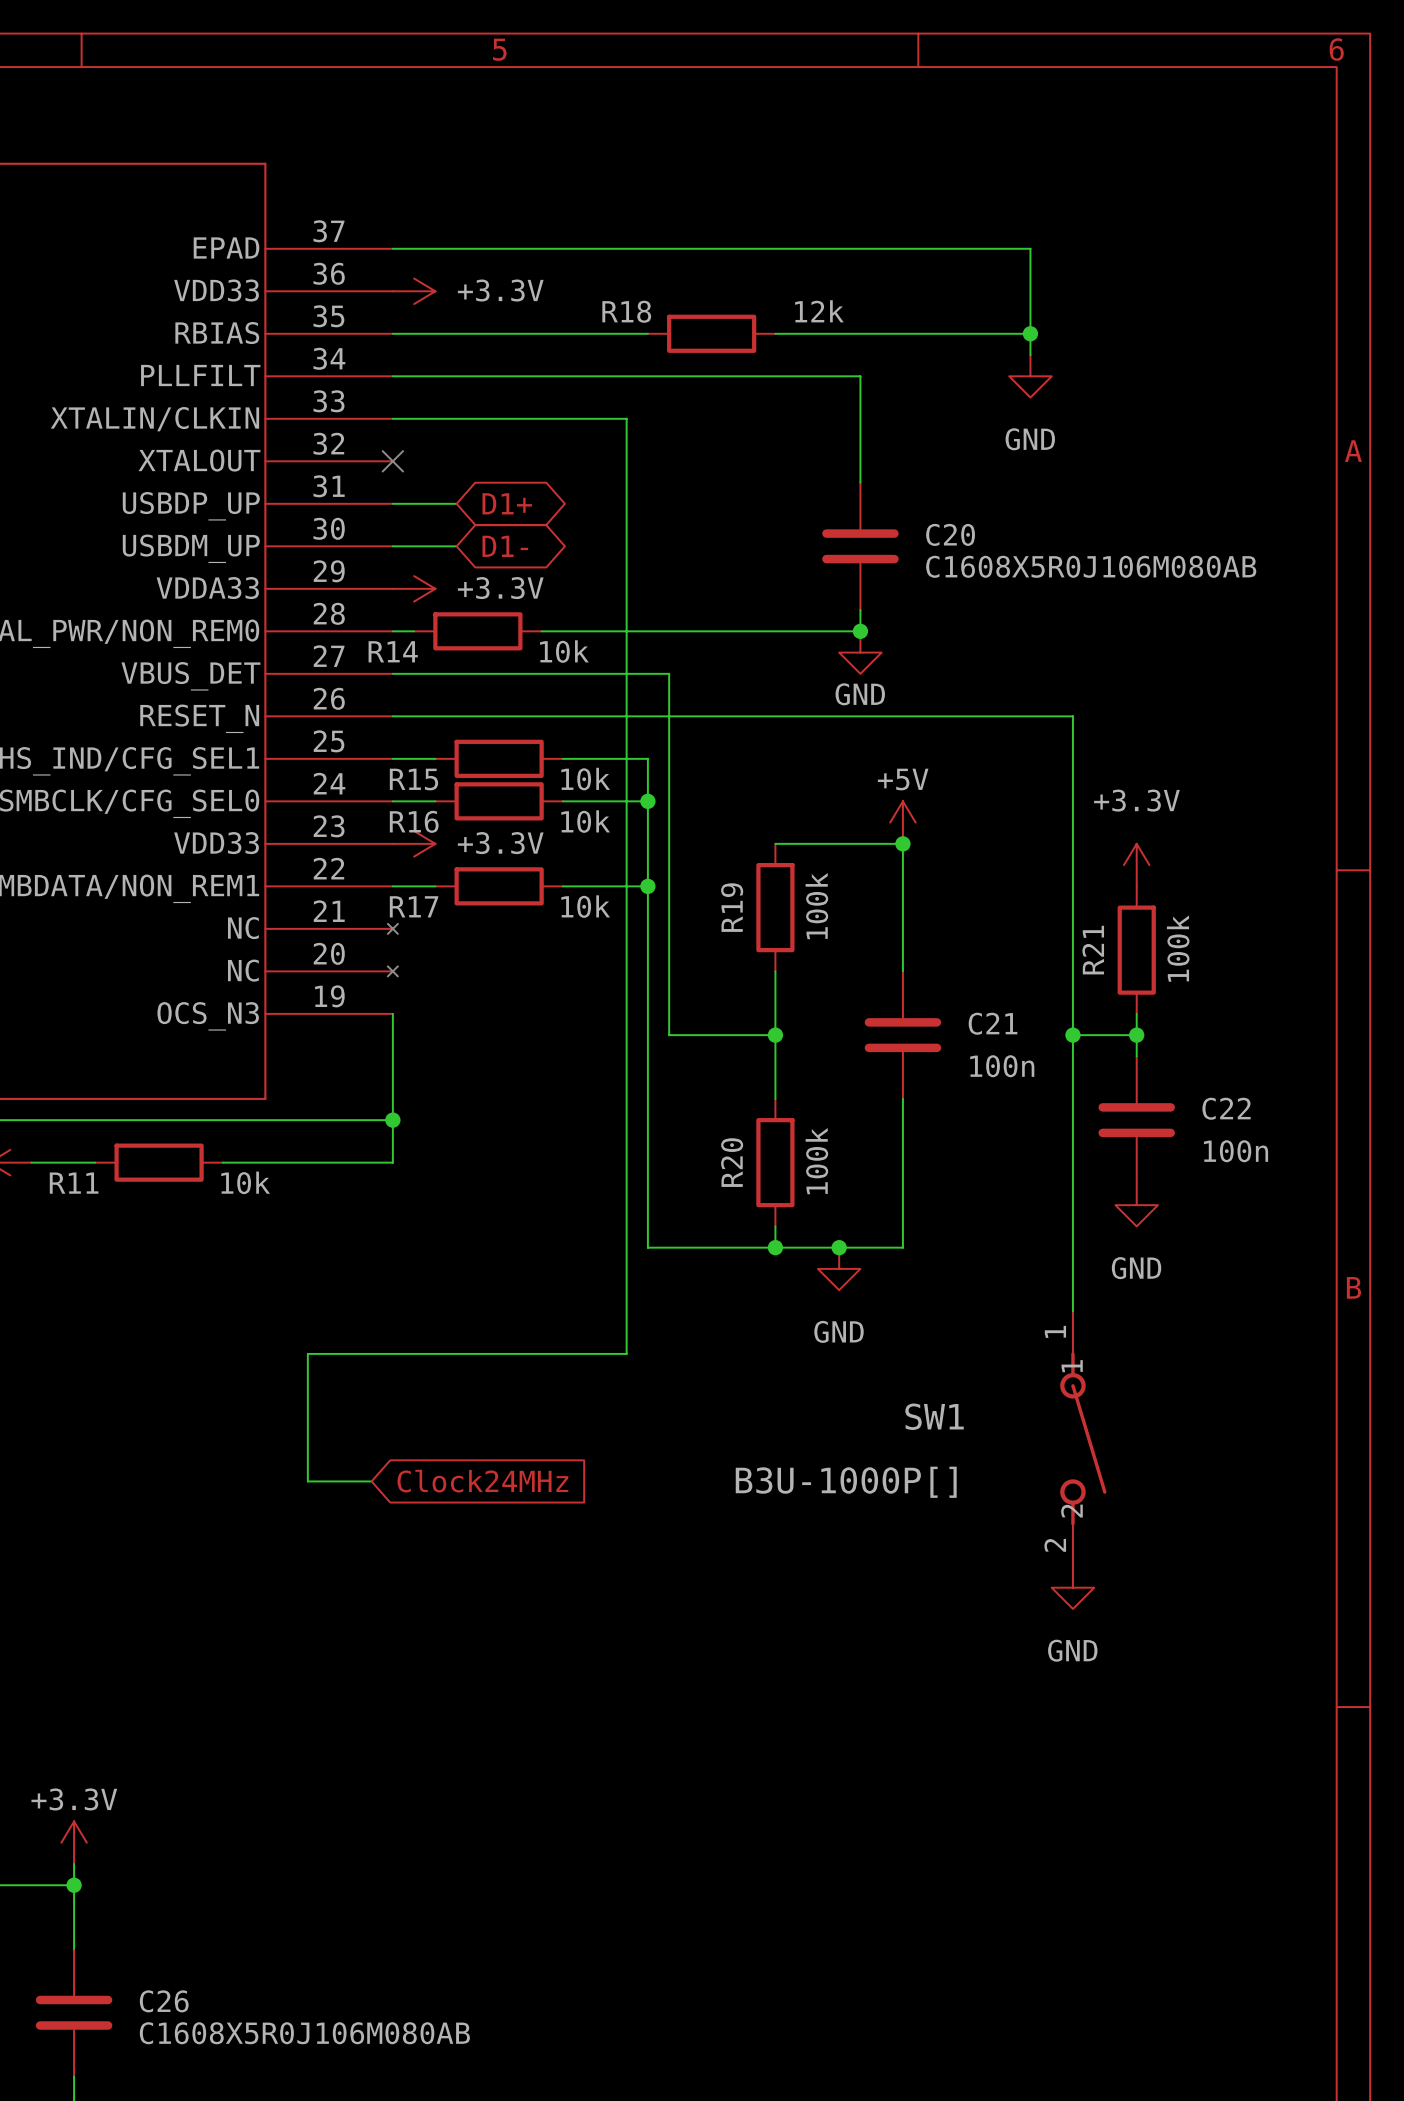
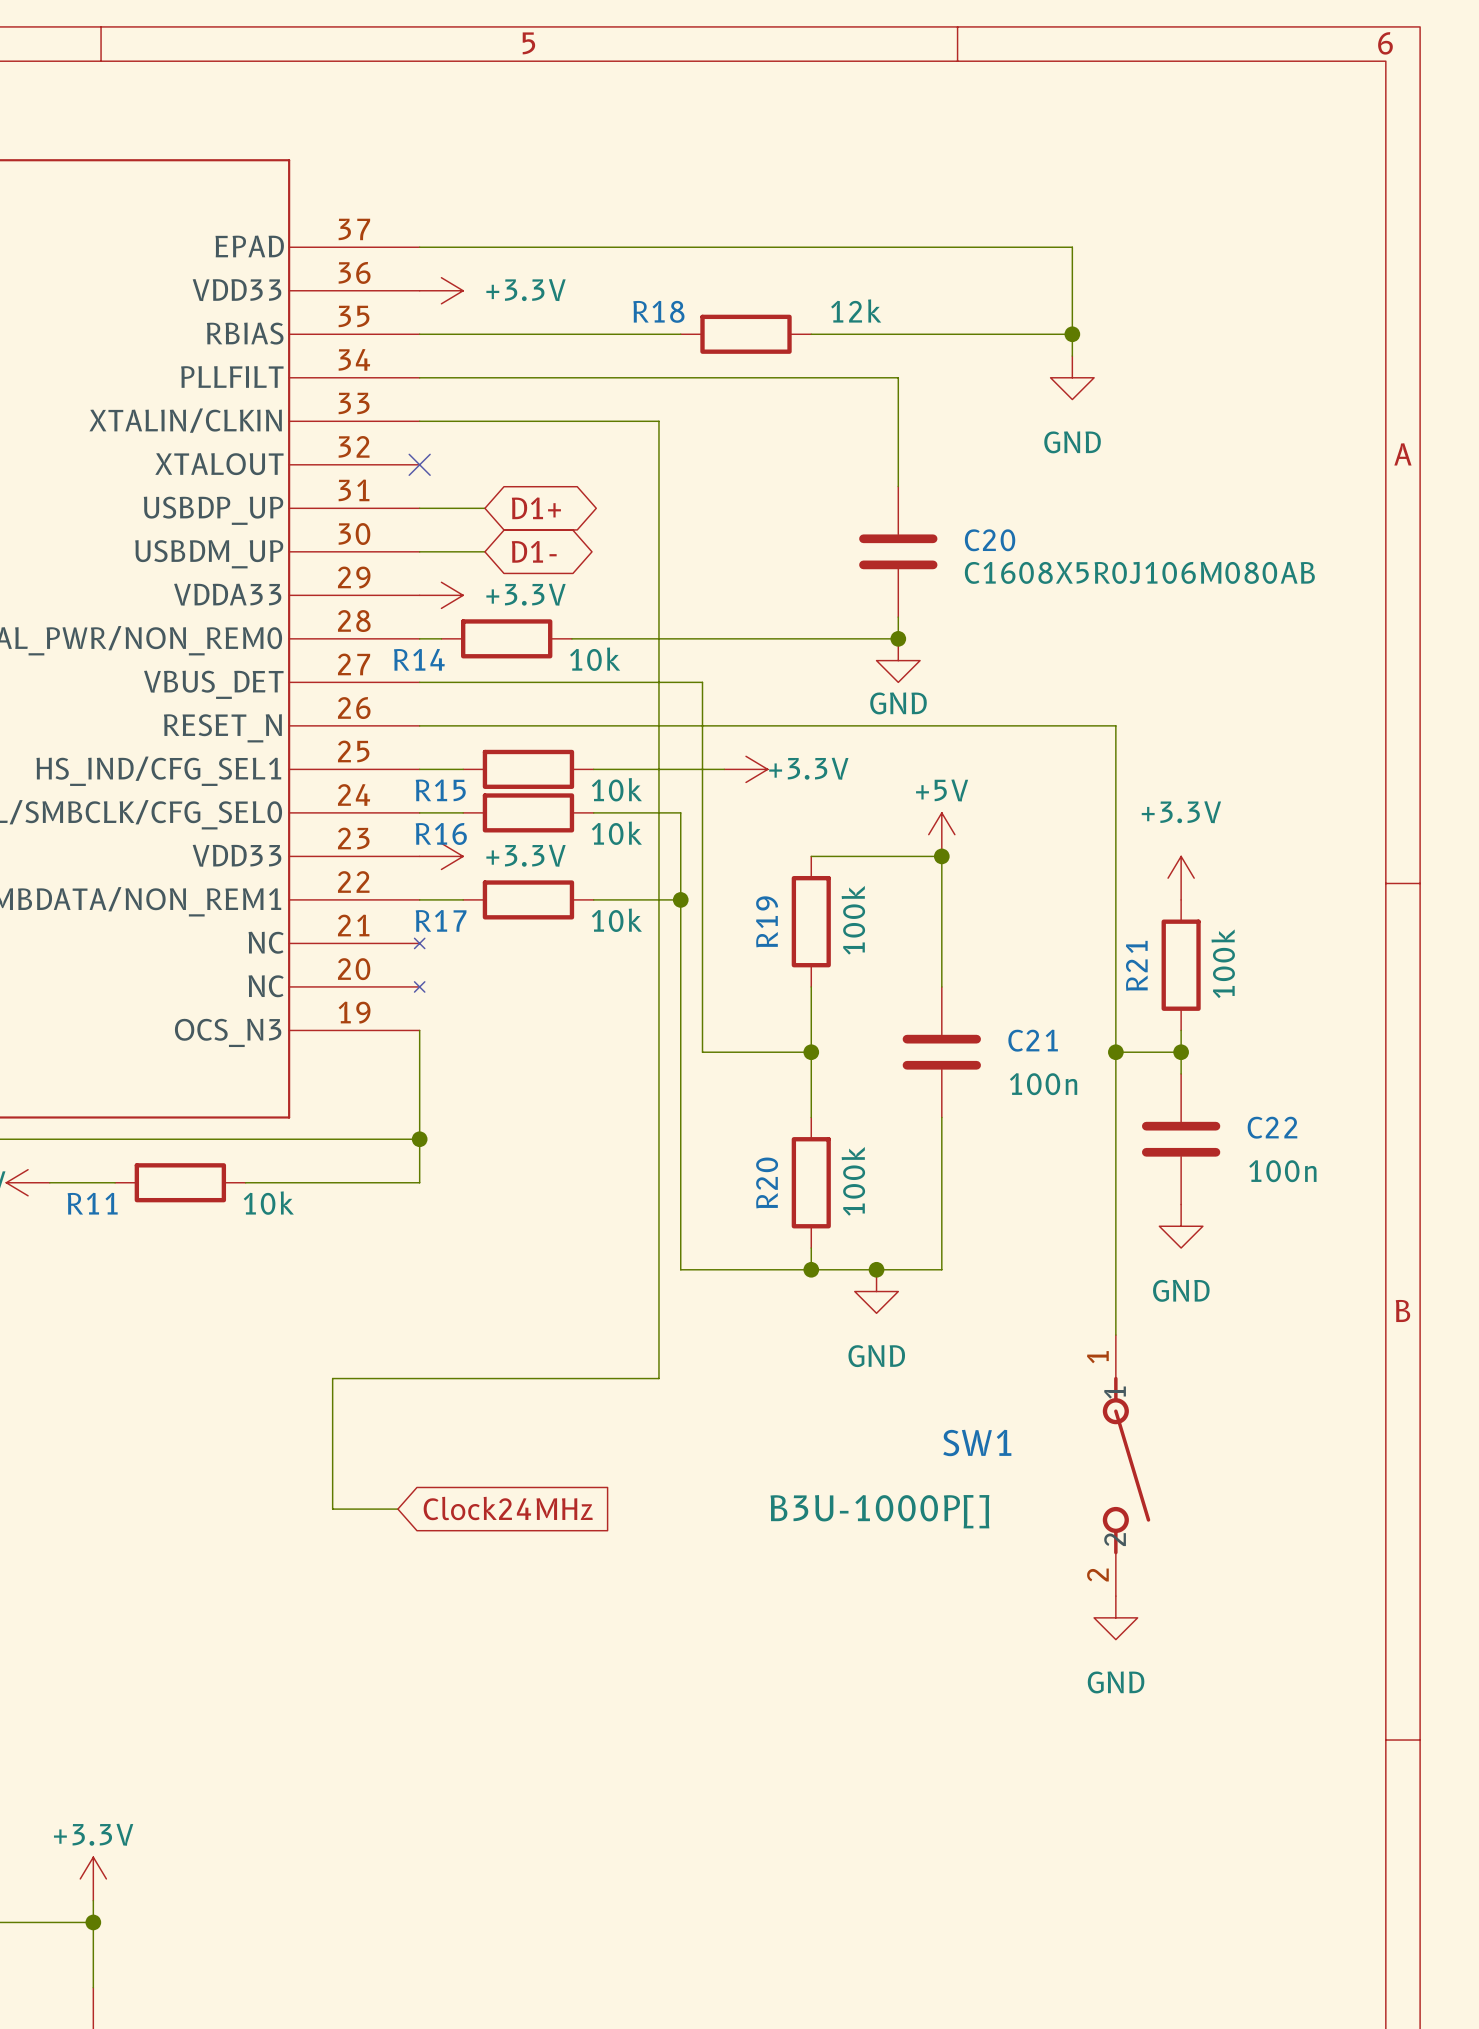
wire: (647, 758) (647, 801) -> (680, 769) (724, 769)
power symbol: none -> +3.3V (746, 769)
junction: (647, 801) -> none

